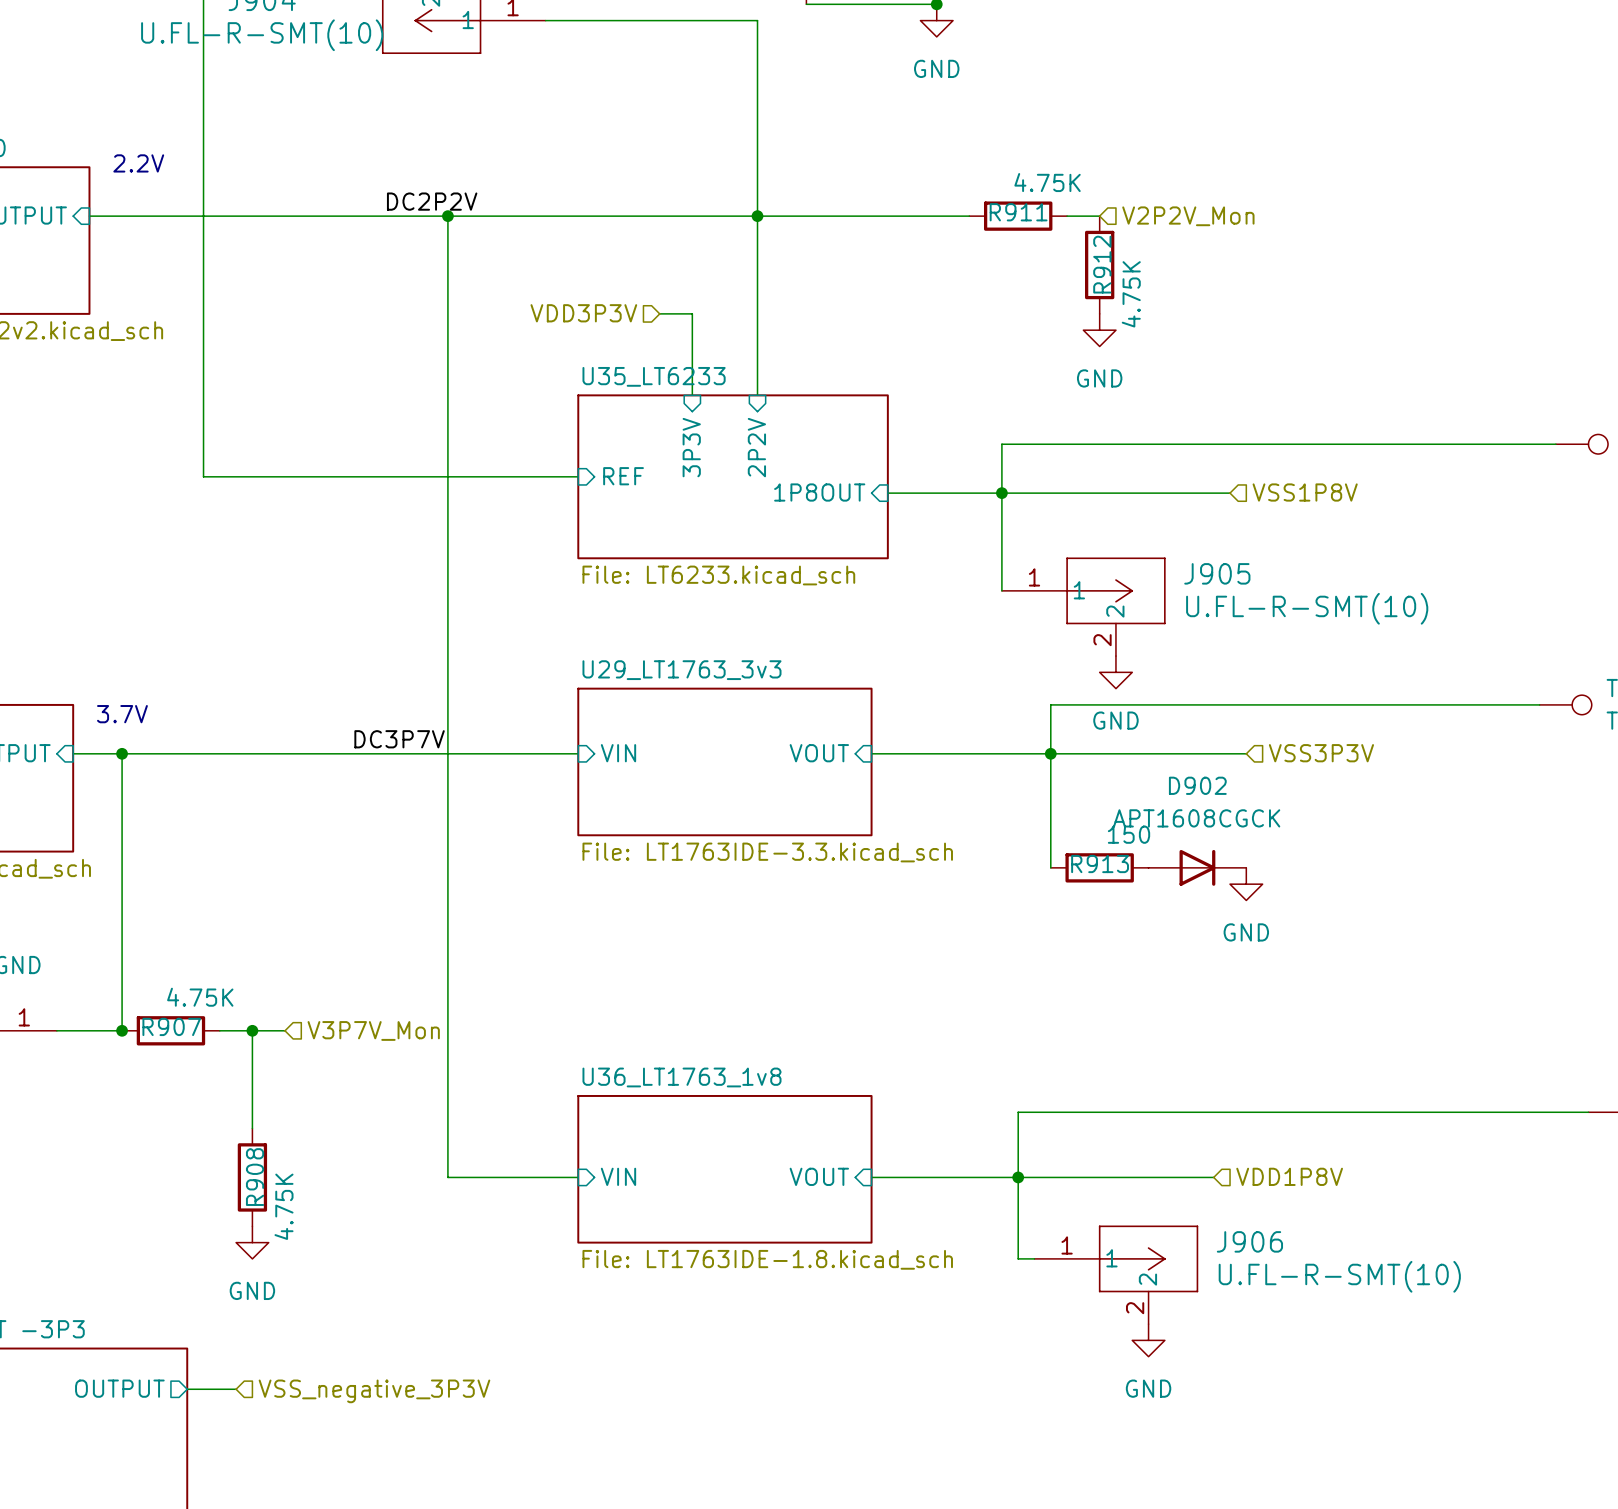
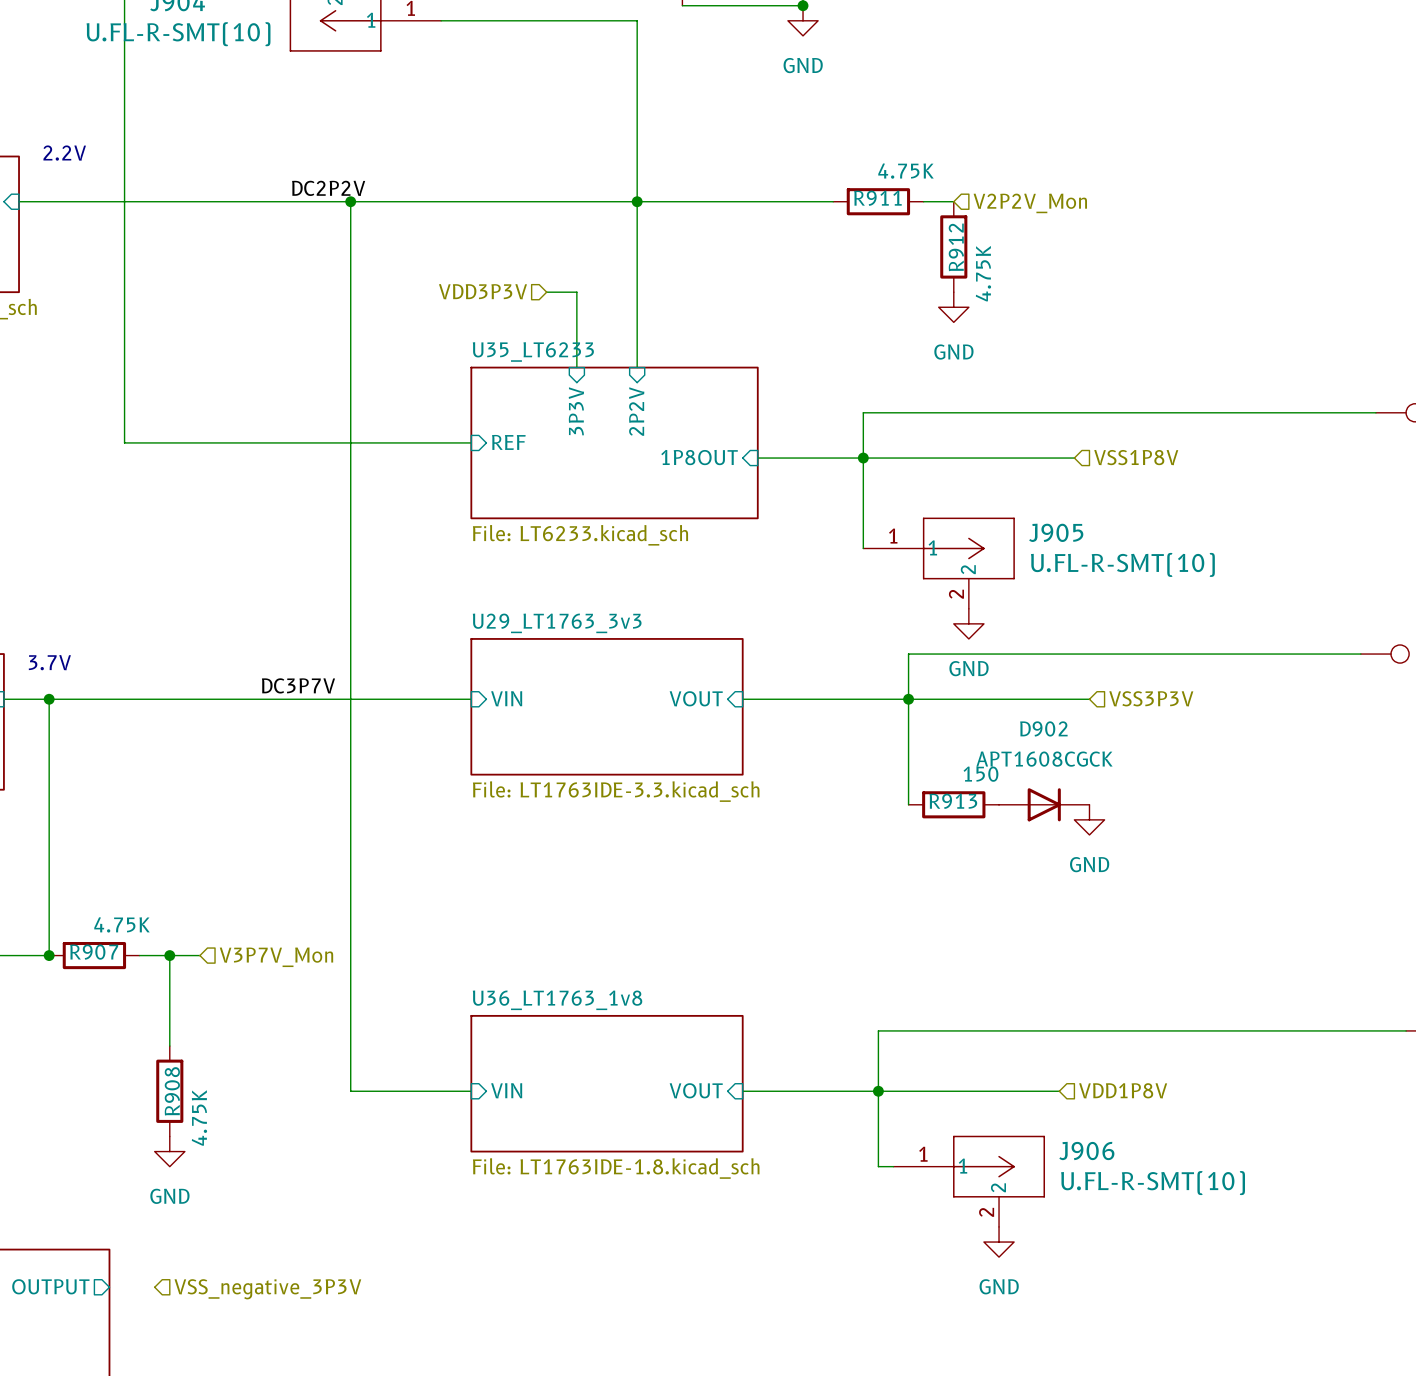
wire: (187, 1389) (236, 1389) -> none

